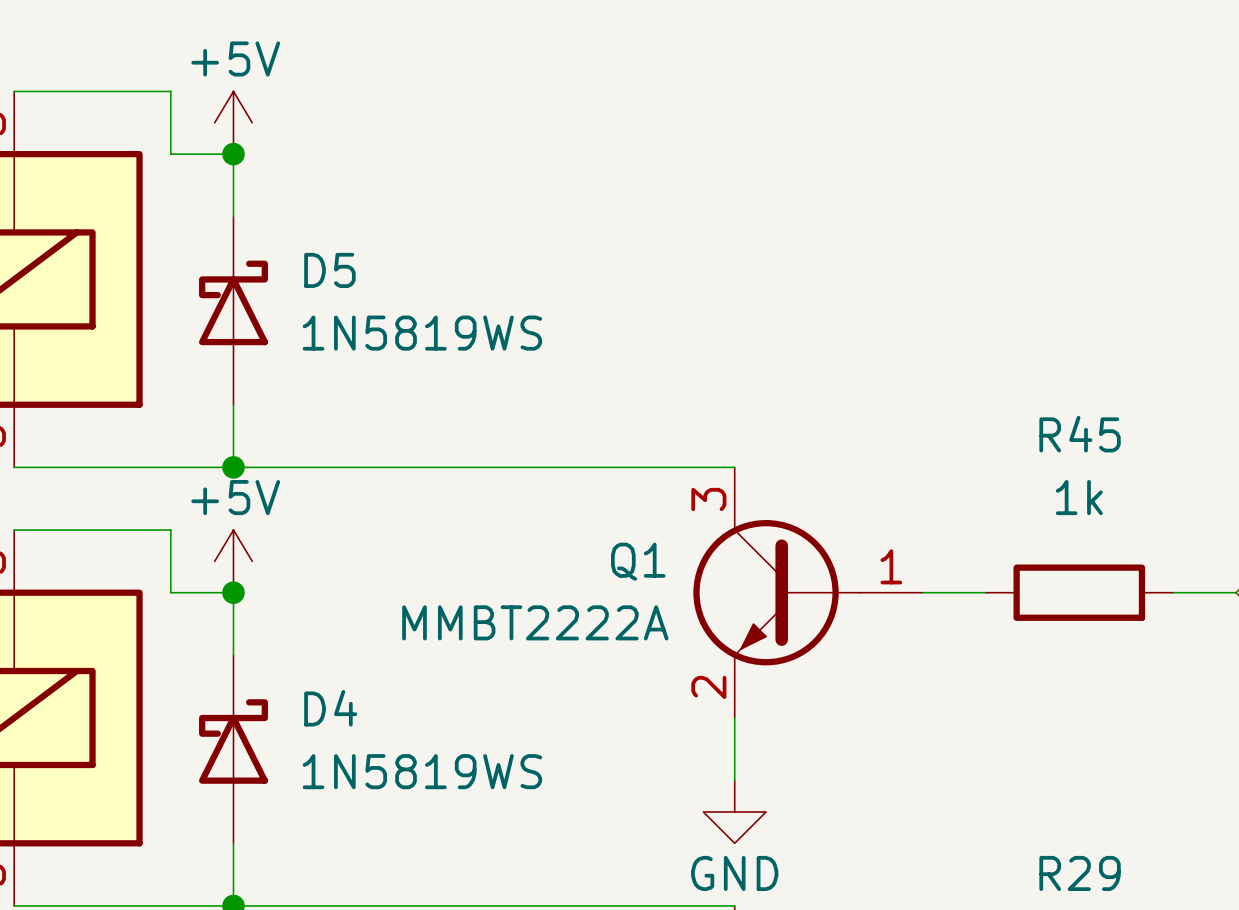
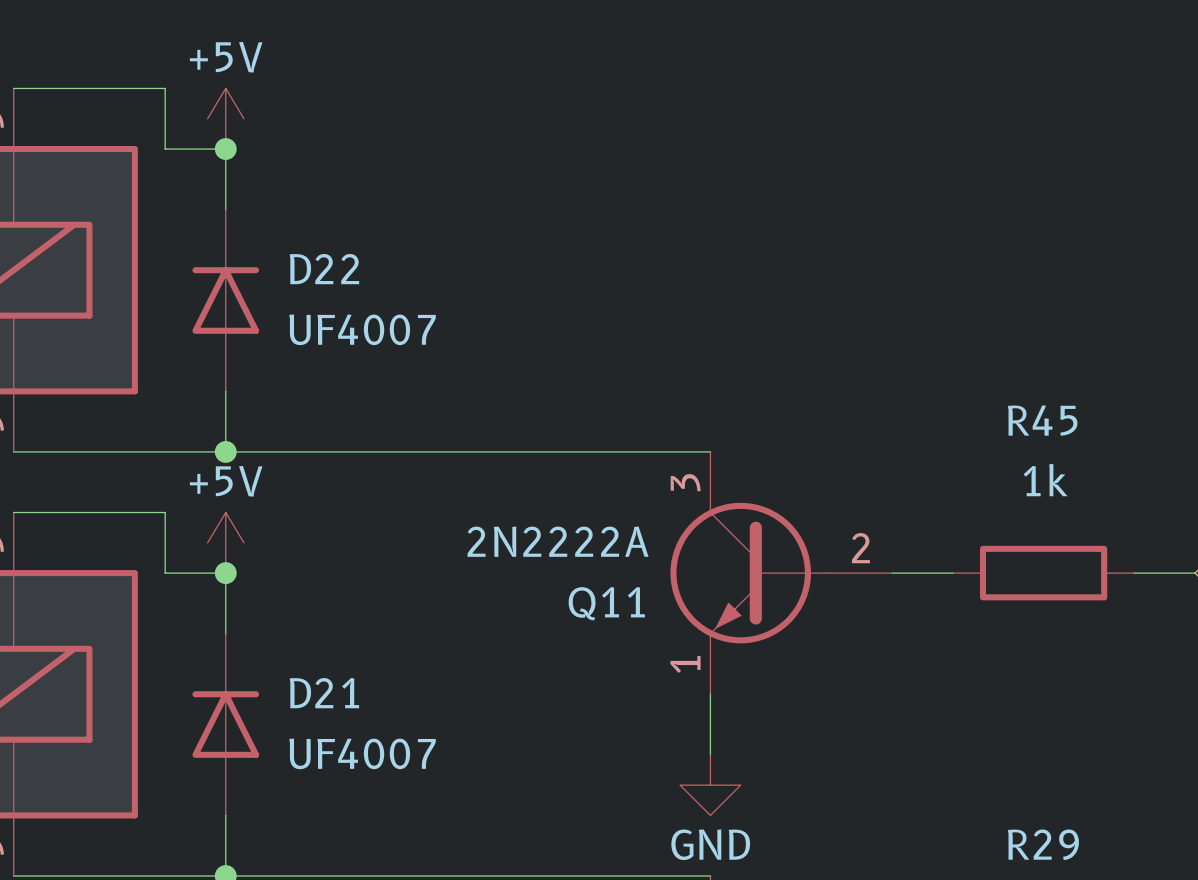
D5: 1N5819WS (233, 310) -> none
D22: none -> UF4007 (225, 300)
Q1 name: Q1 (638, 561) -> Q11 (606, 603)
Q1 pin number: 1 (891, 566) -> 2 (860, 548)
Q1 value: MMBT2222A (535, 622) -> 2N2222A (558, 541)
Q1 pin number: 2 (708, 687) -> 1 (685, 664)
D4: 1N5819WS (233, 749) -> none
D21: none -> UF4007 (225, 724)

